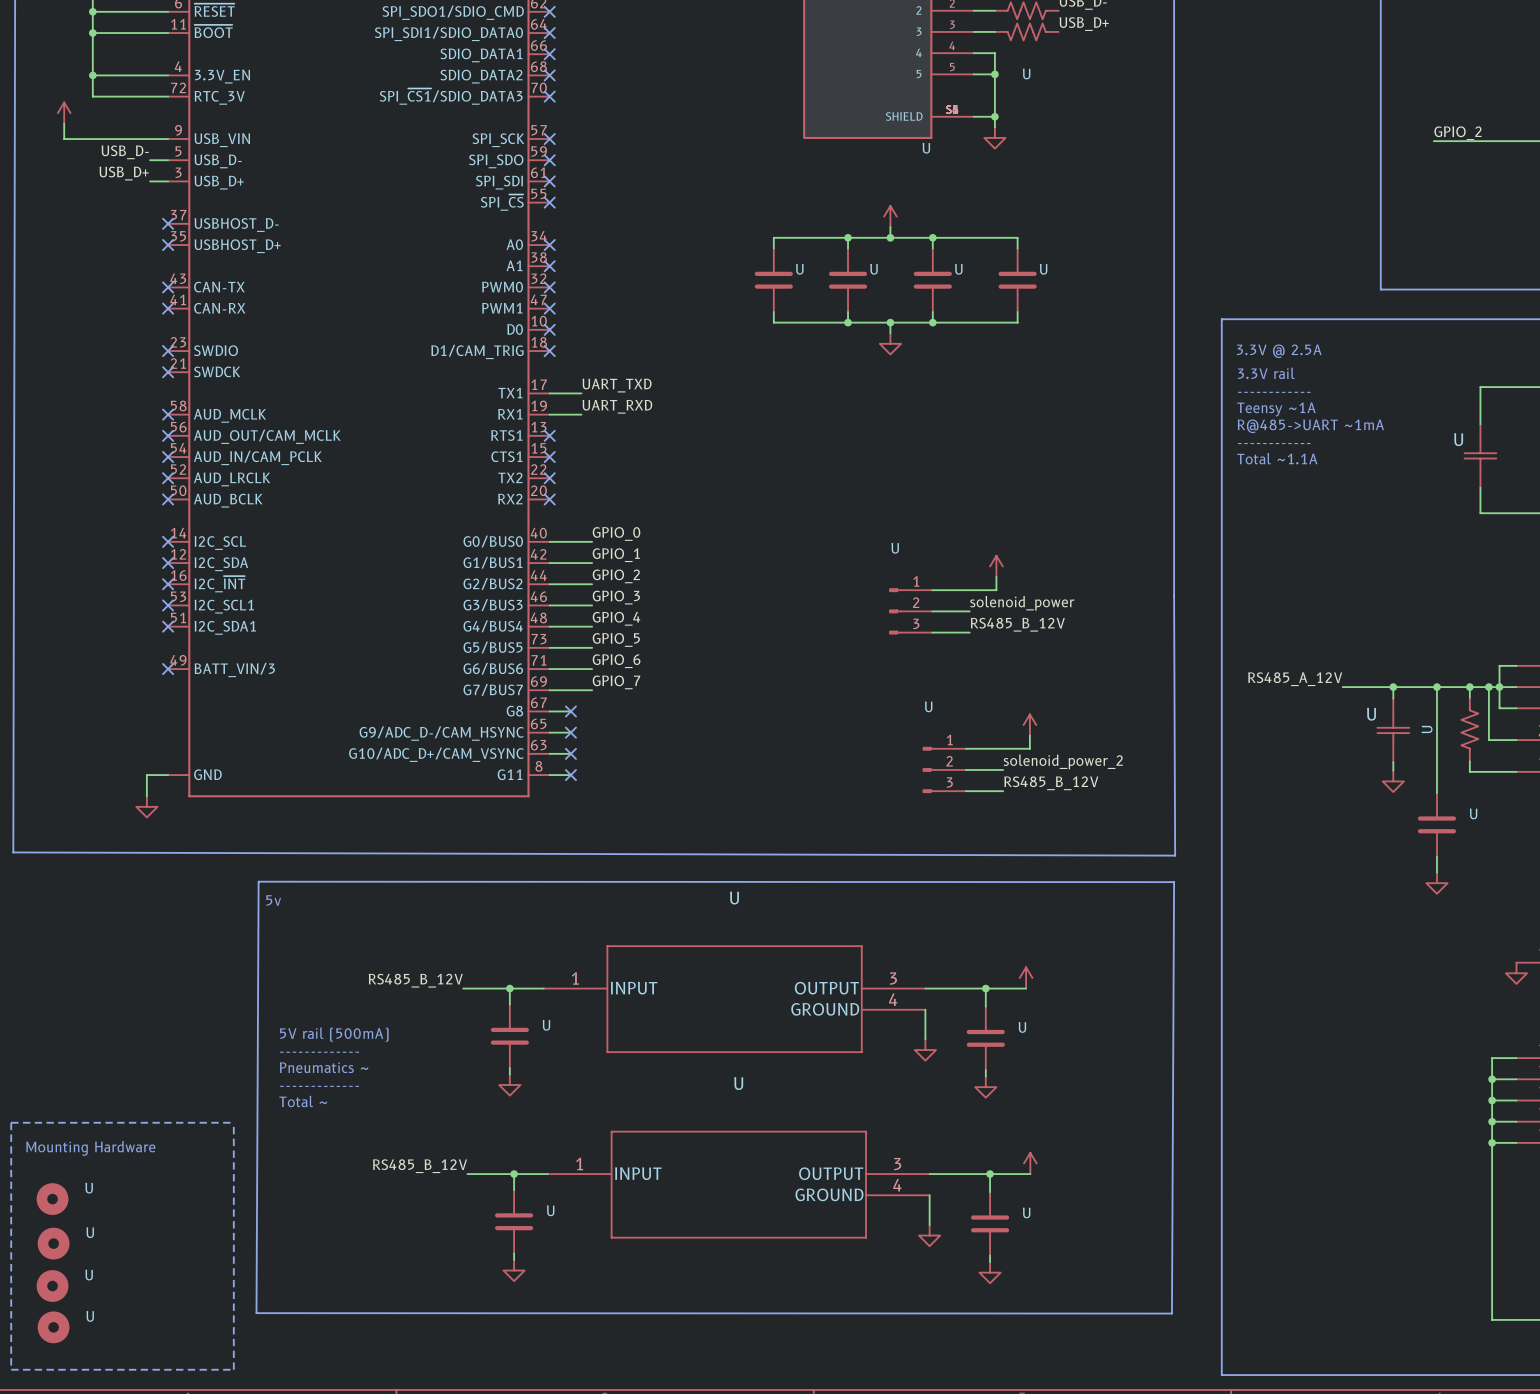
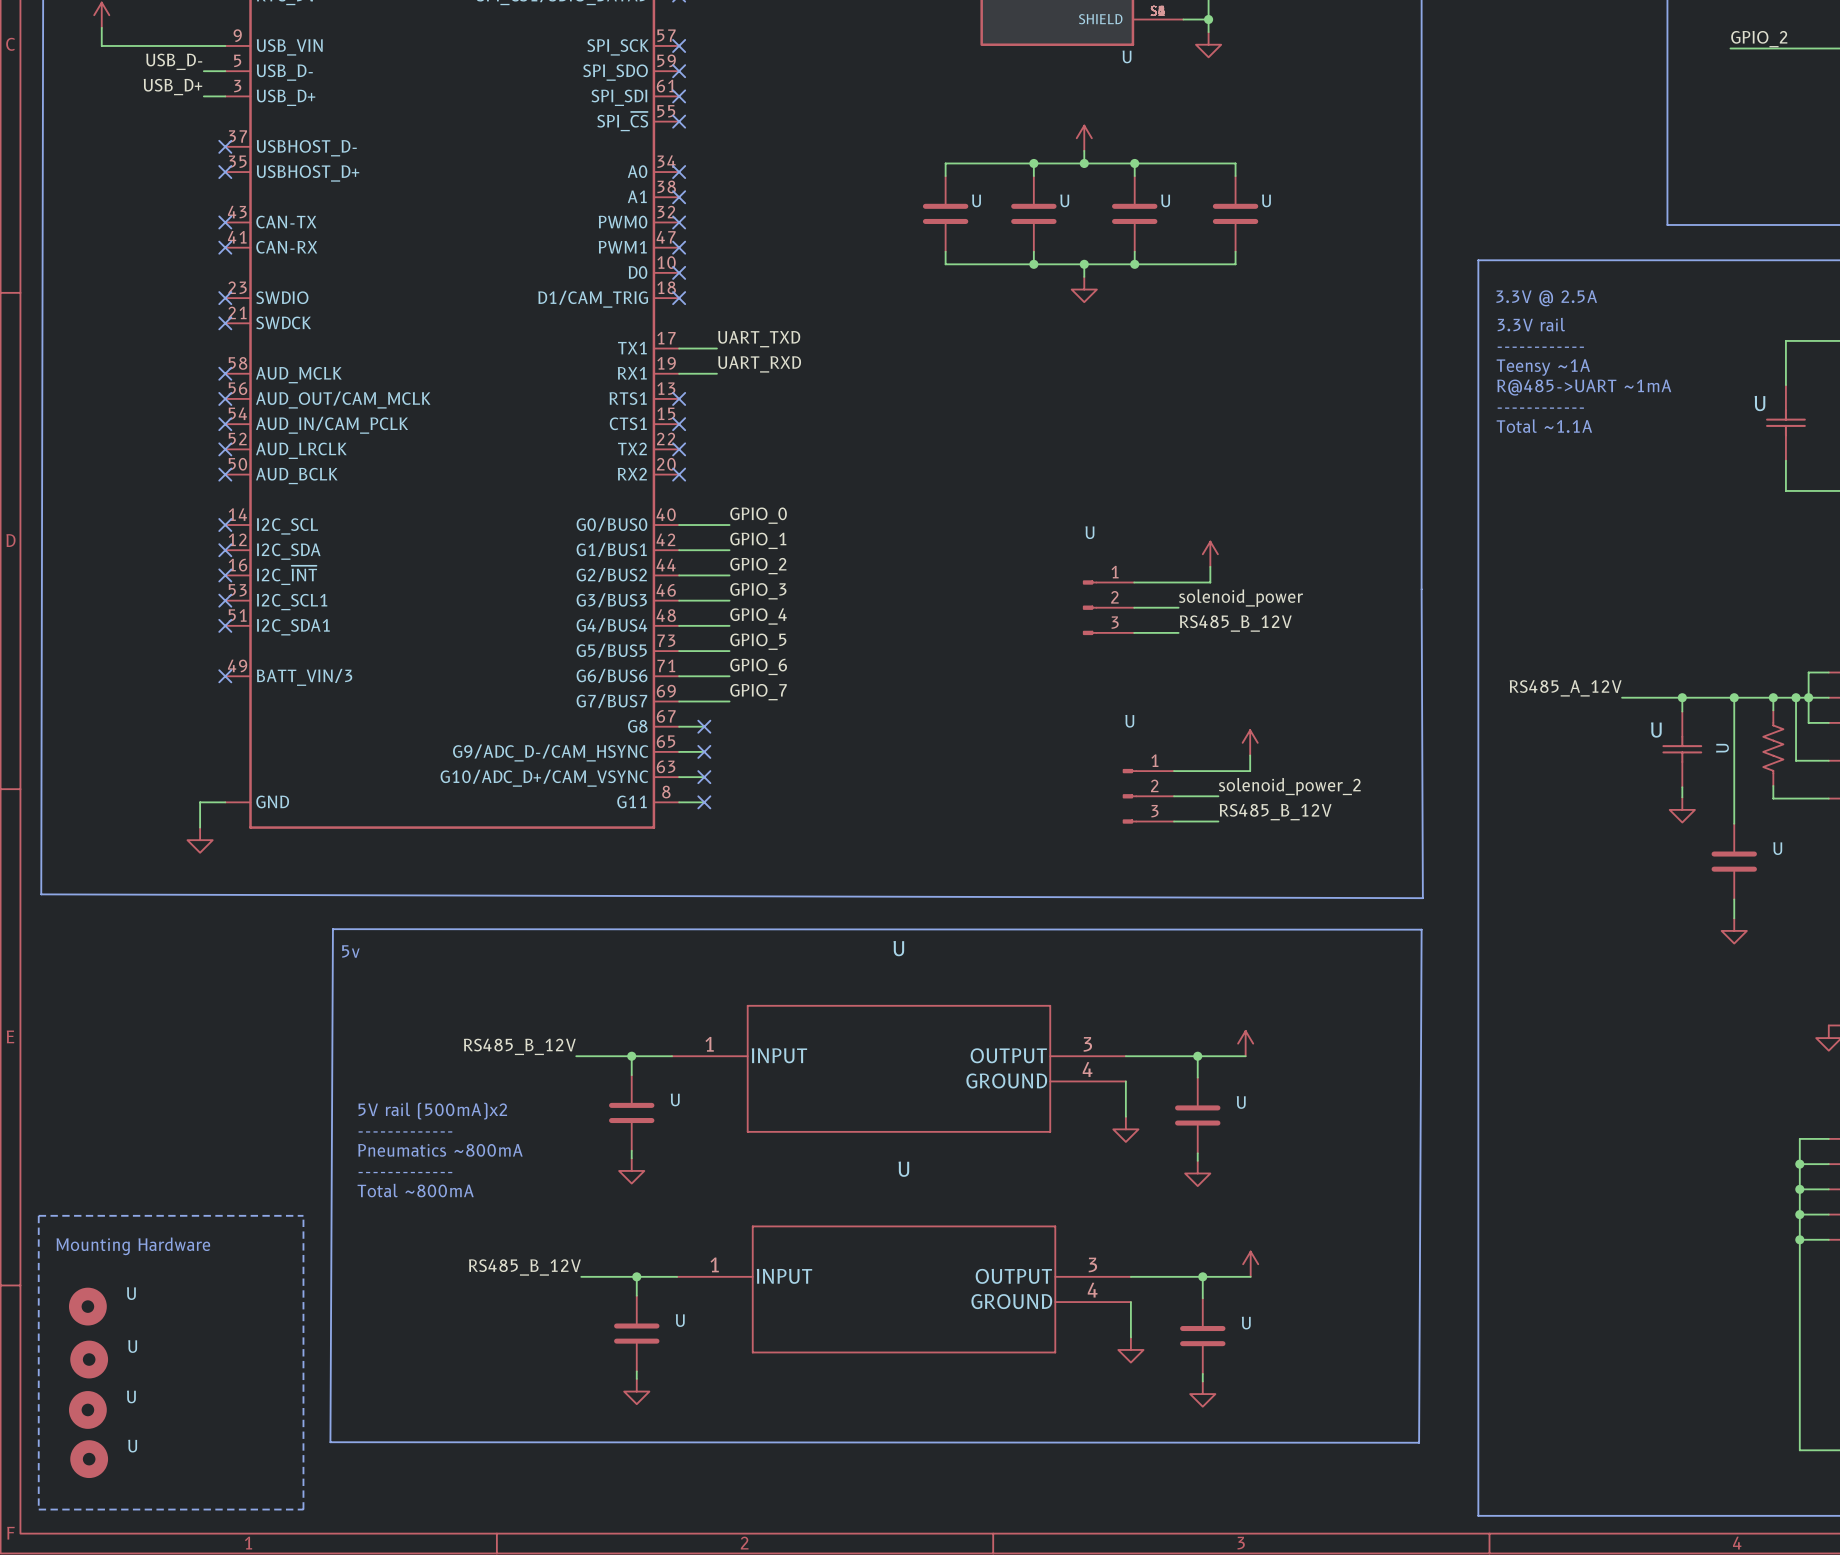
text: 5V rail (500mA) (334, 1034) -> 5V rail (500mA)x2 (432, 1111)
text: Pneumatics ~ (324, 1067) -> Pneumatics ~800mA (440, 1150)
text: Total ~ (303, 1101) -> Total ~800mA (415, 1190)

